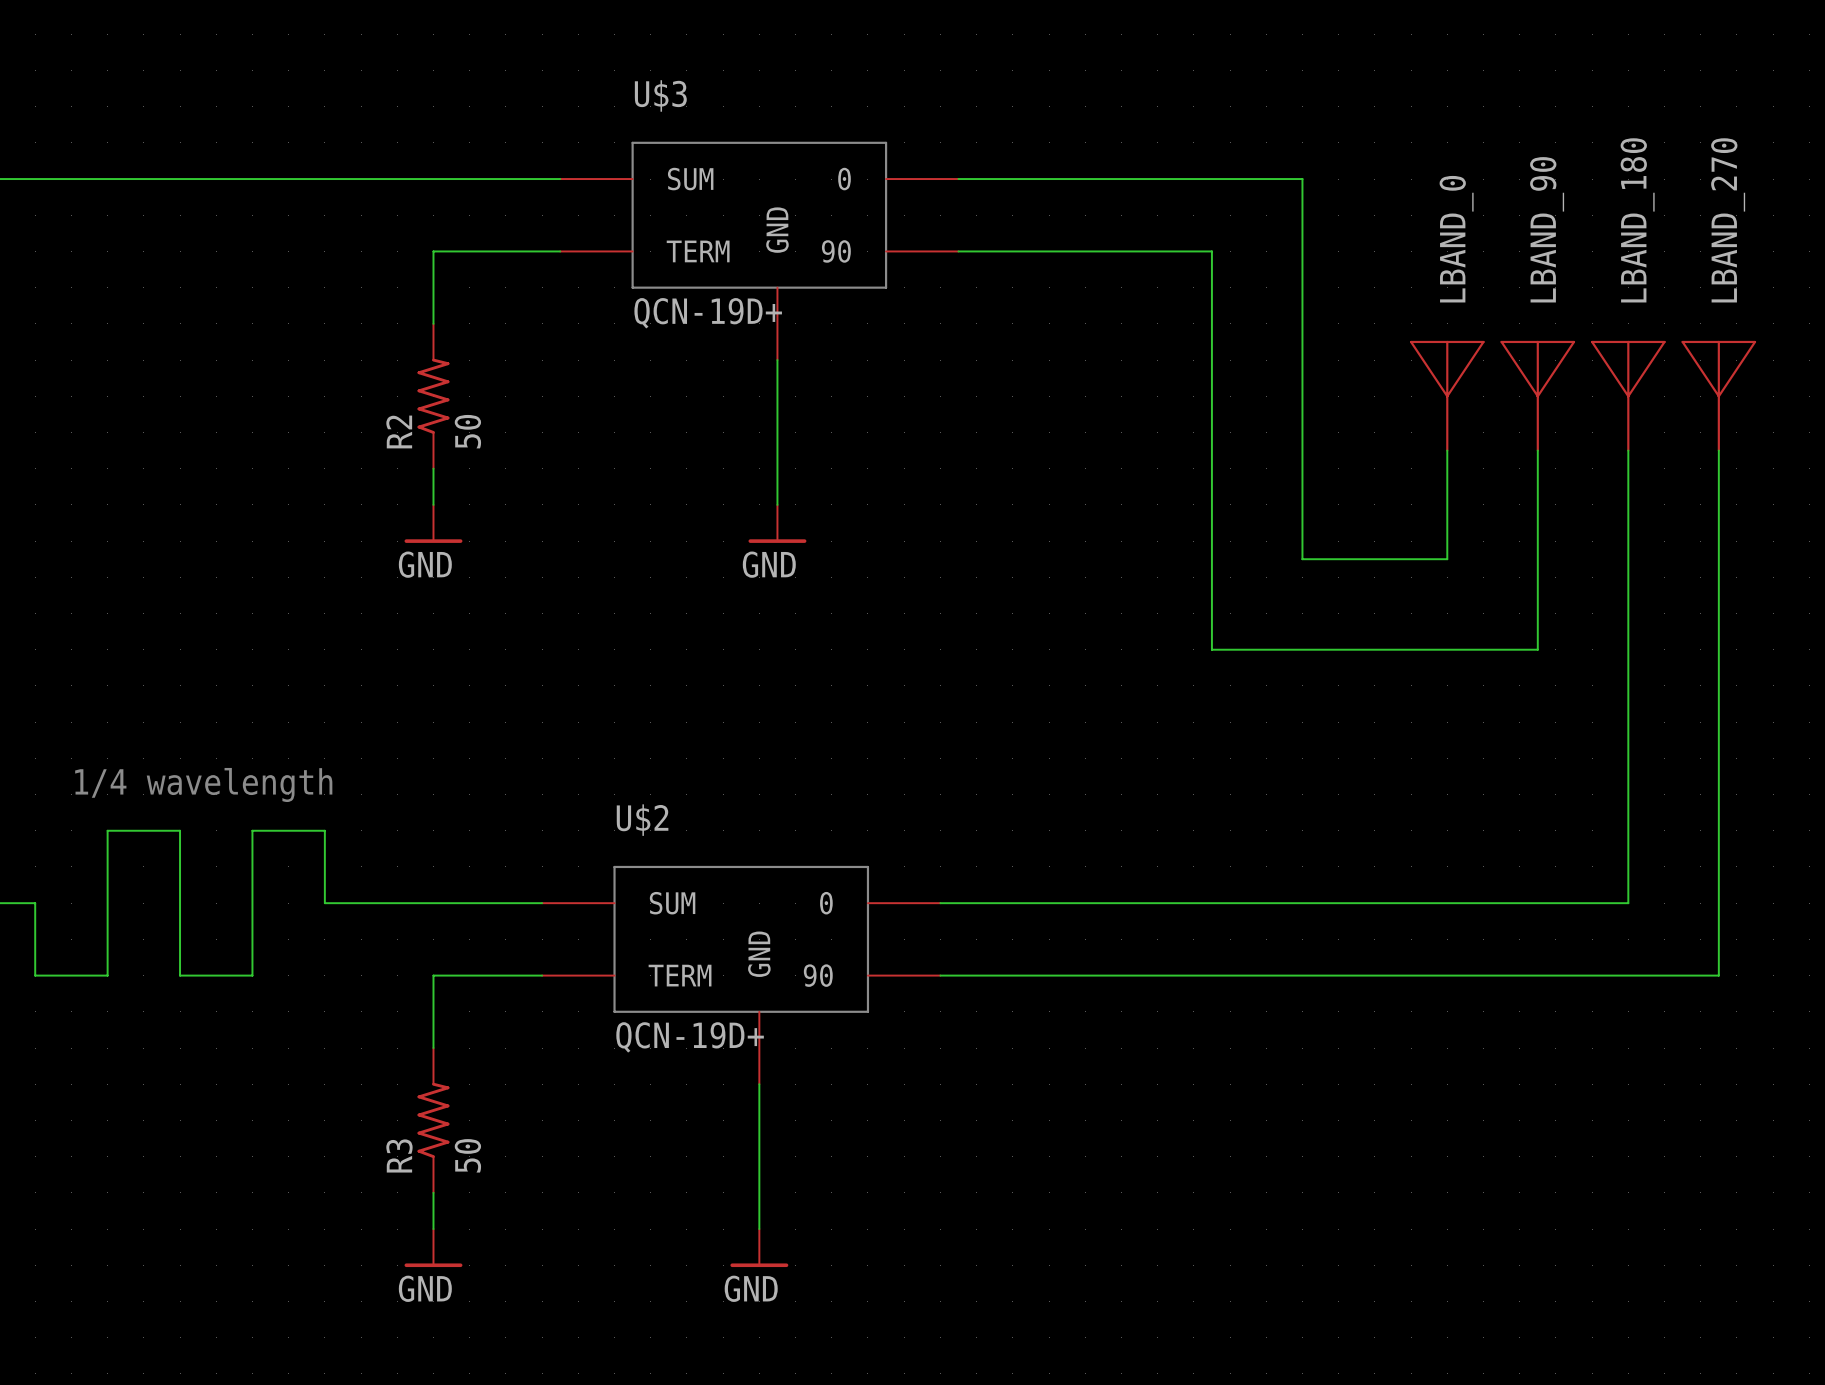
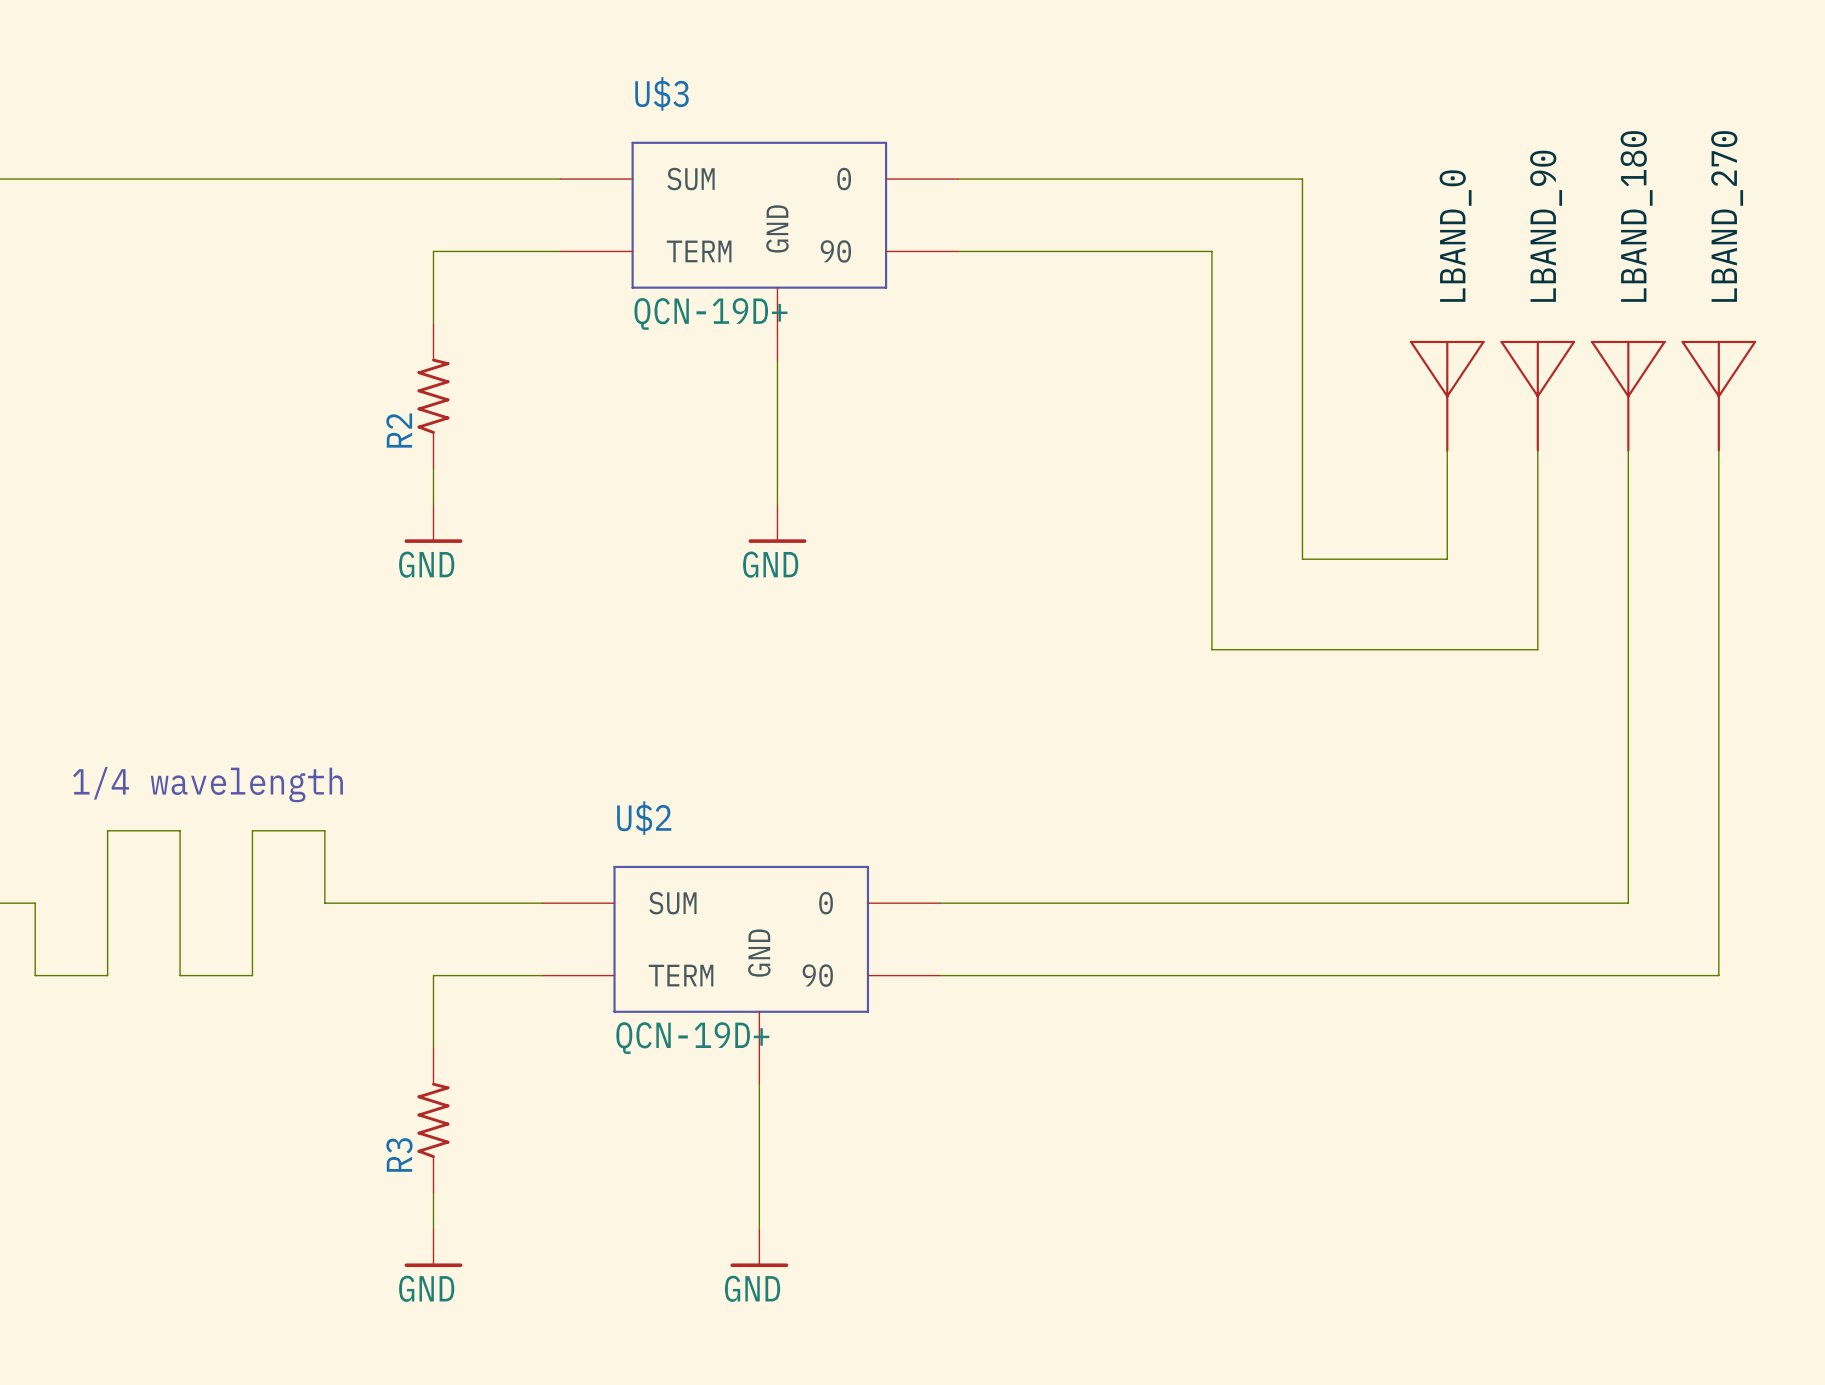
R2 value: 50 (467, 431) -> none
R3 value: 50 (467, 1155) -> none

